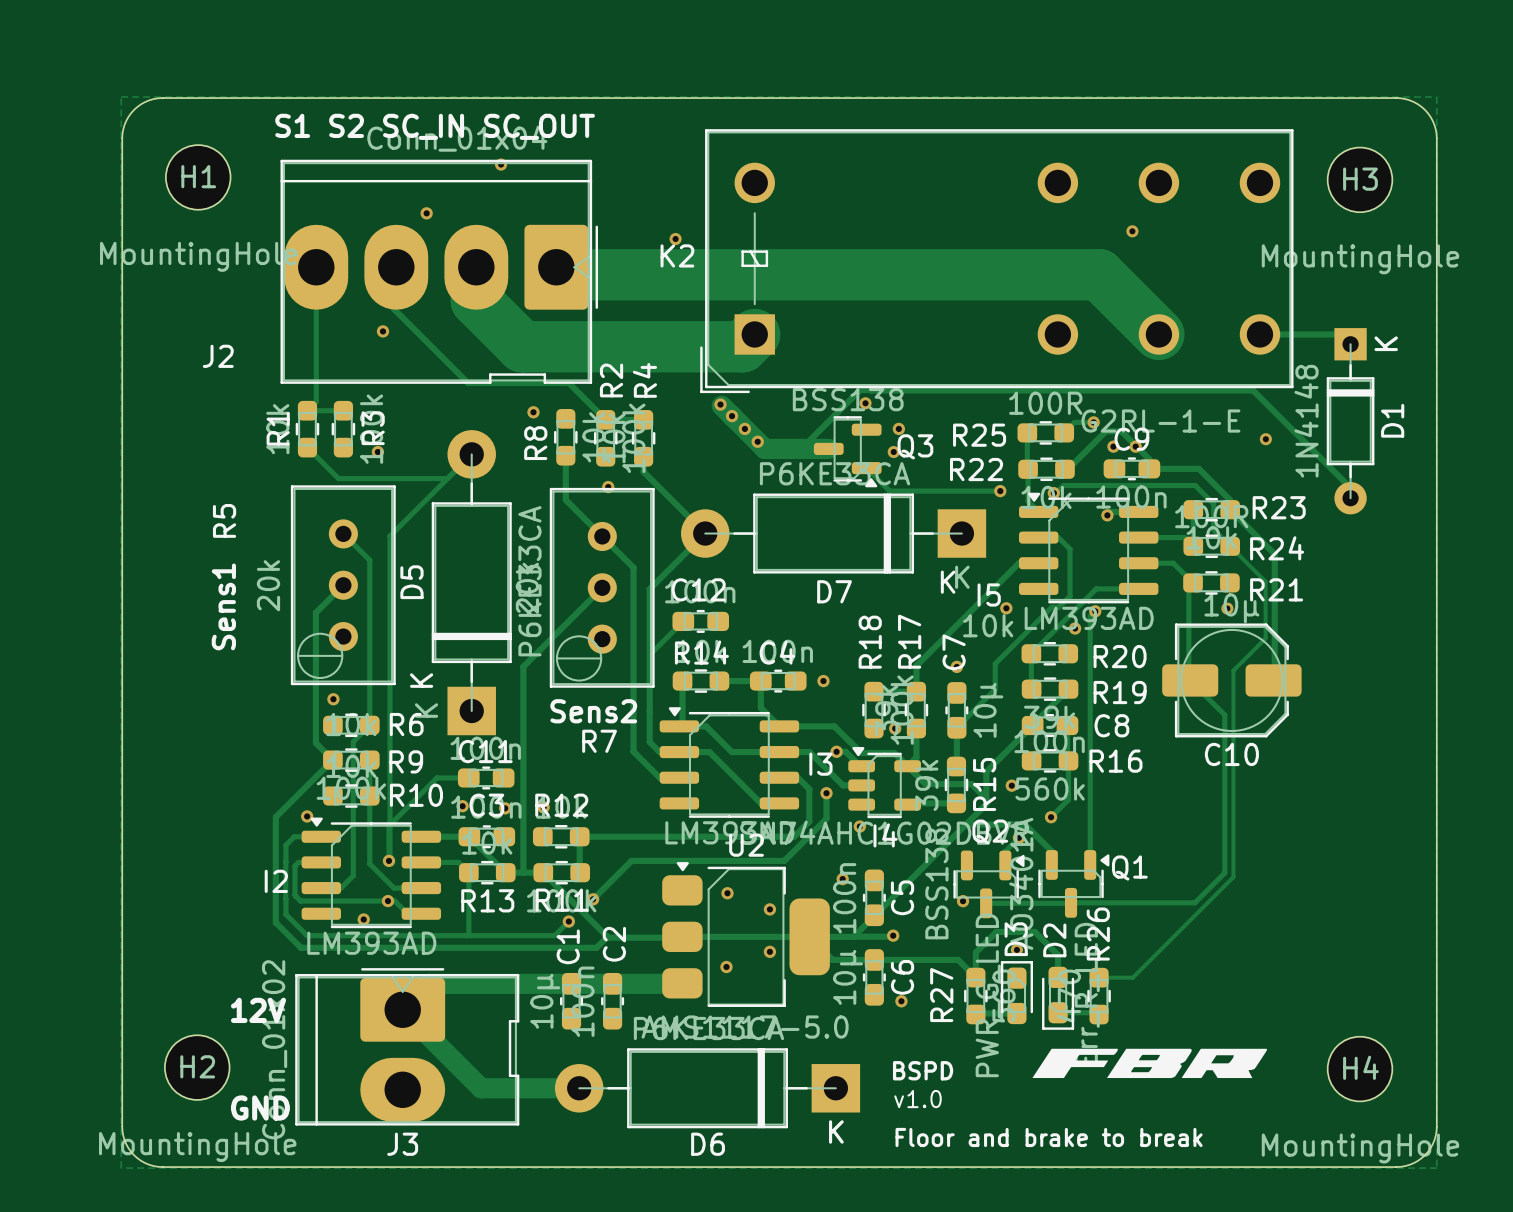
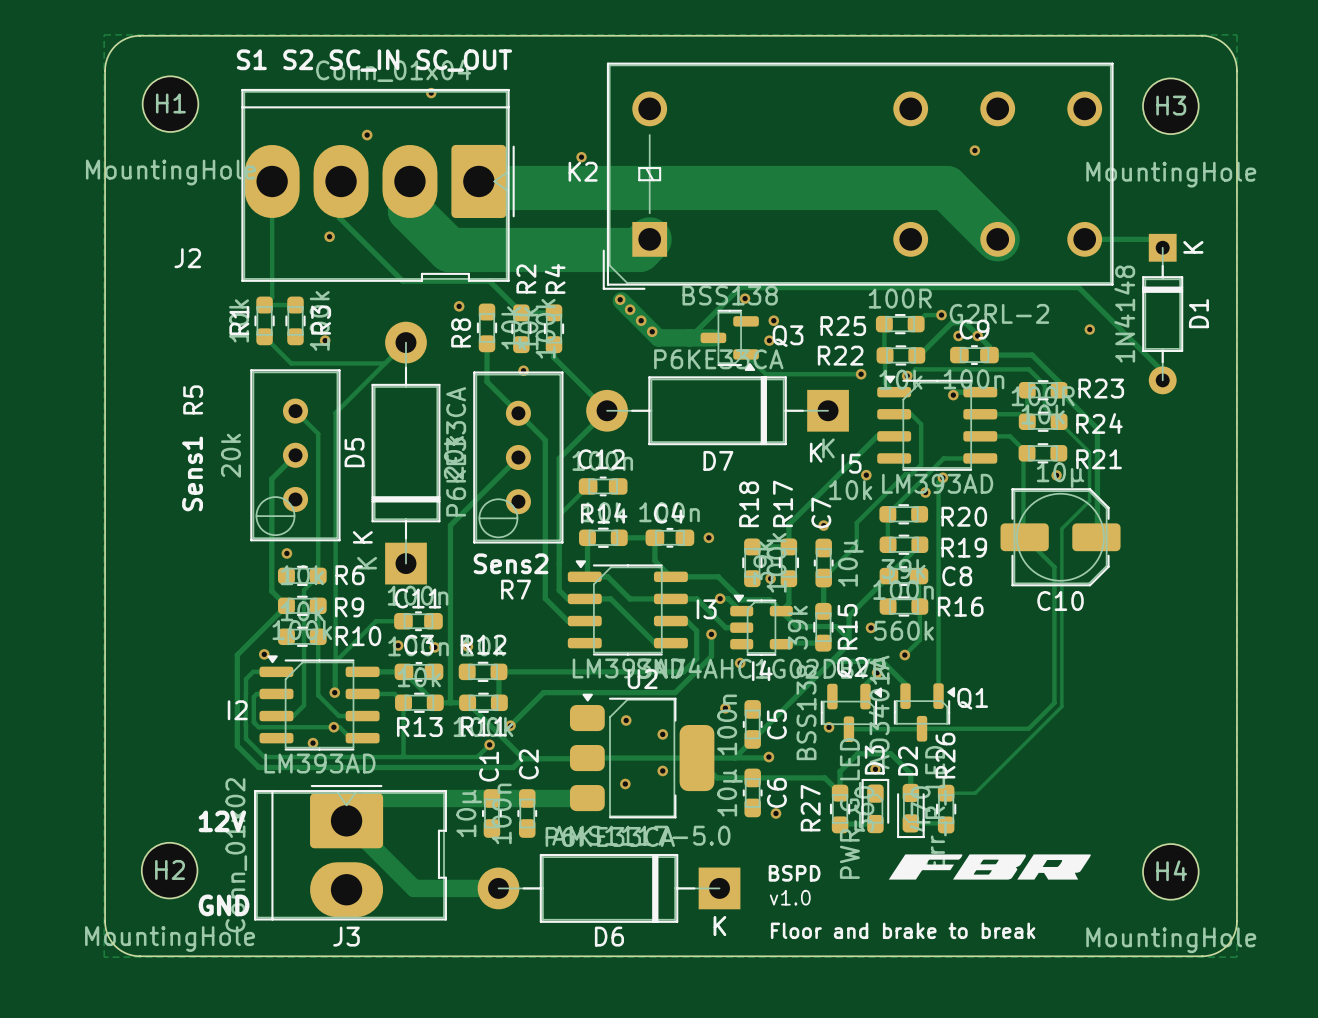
K2 value: G2RL-1-E (1160, 421) -> G2RL-2 (999, 313)

